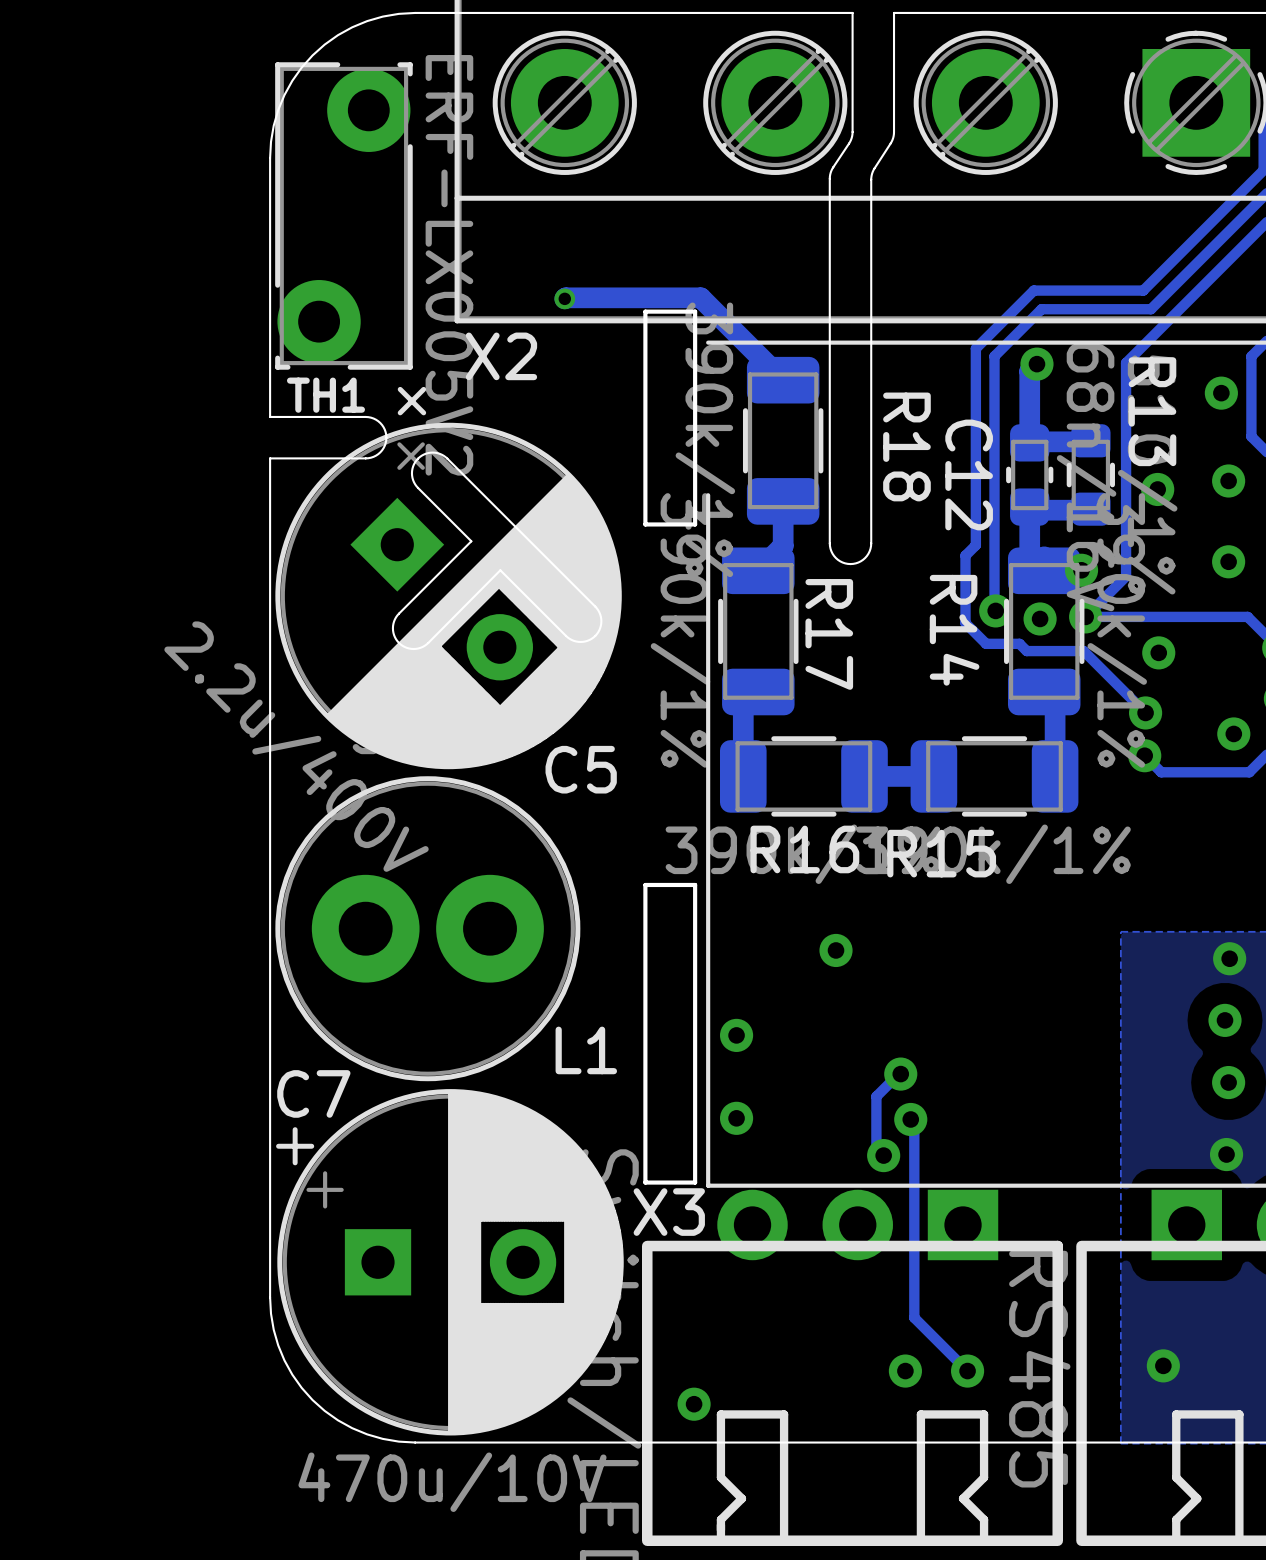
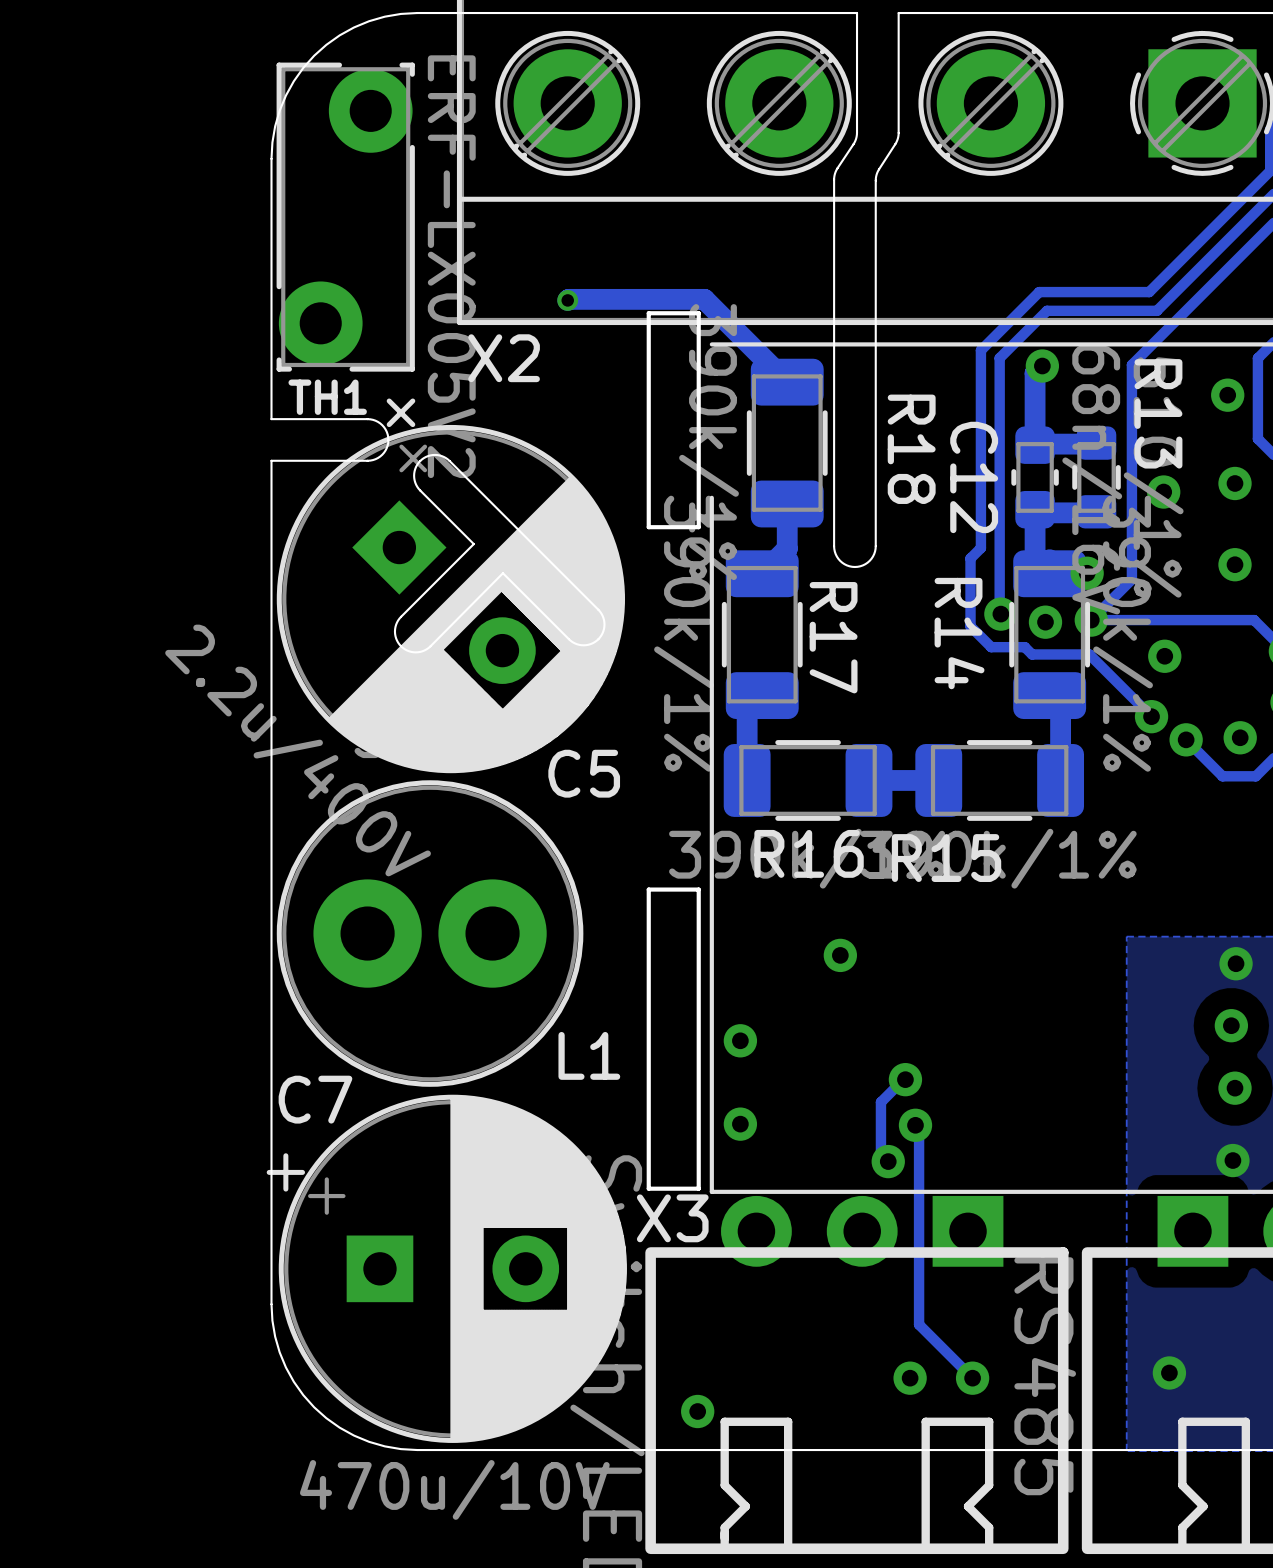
C5 footprint: [275, 386, 622, 770] -> [276, 398, 626, 774]
track: (1144, 755) (1161, 772) (1216, 772) -> (1186, 739) (1222, 776)
via position: (1144, 755) -> (1186, 739)
C7 footprint: [276, 1089, 624, 1436] -> [266, 1094, 627, 1443]

